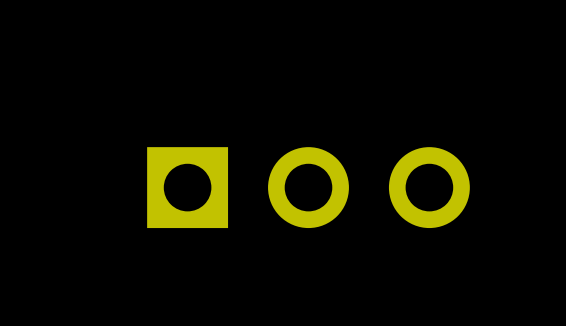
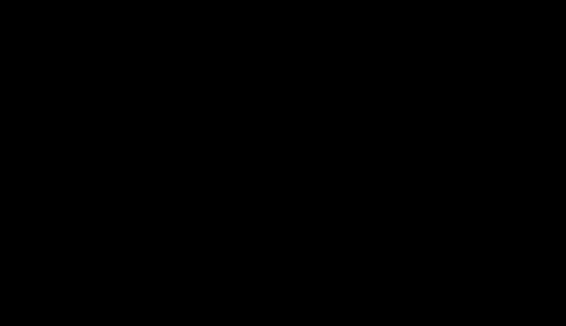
part: (308, 187) -> none

